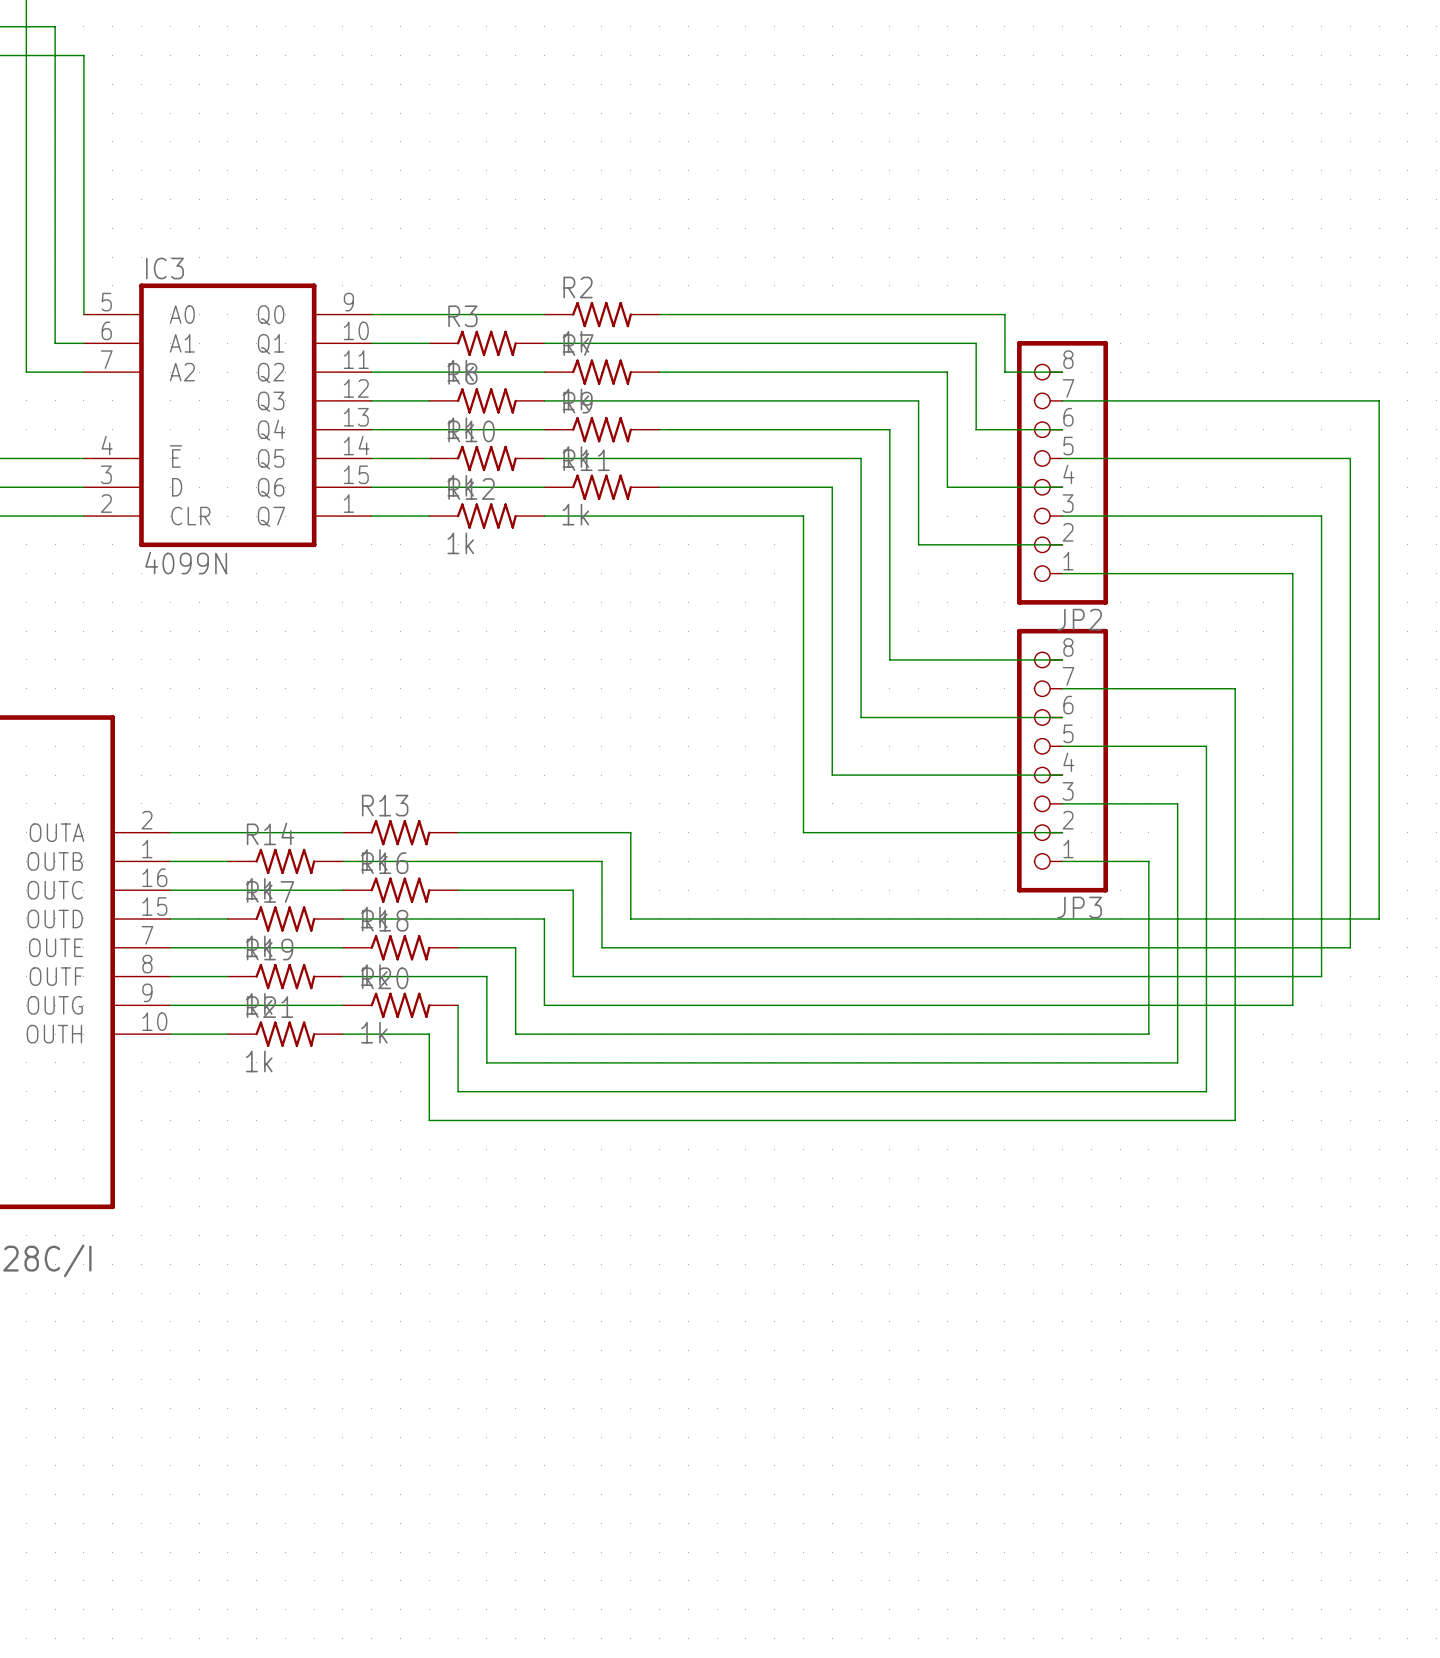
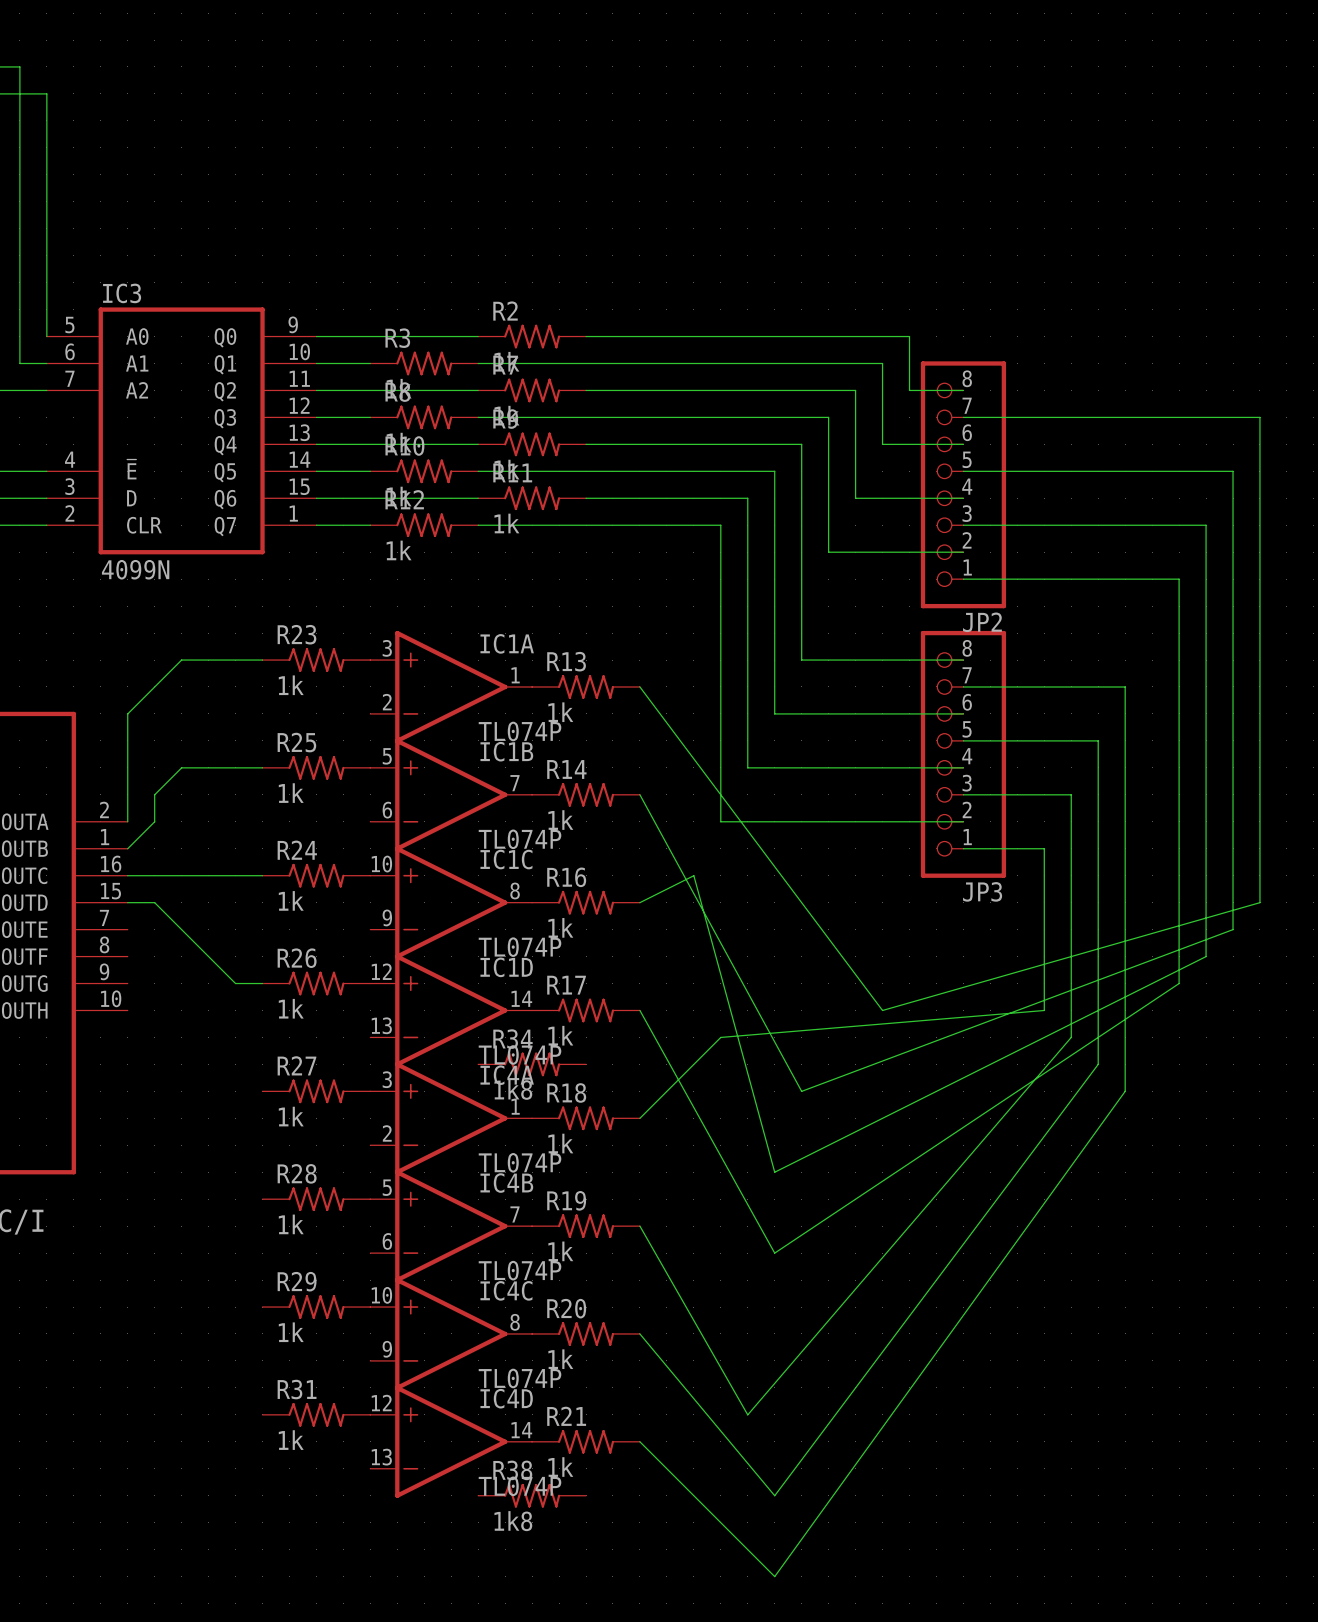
R23: none -> 1k (316, 660)
IC1A: none -> TL074P (451, 686)
R25: none -> 1k (316, 767)
IC1B: none -> TL074P (451, 794)
wire: (170, 832) (342, 832) -> (127, 821) (127, 713) (181, 660) (262, 660)
R13 position: (400, 832) -> (586, 686)
wire: (458, 832) (630, 832) (630, 918) (1379, 918) -> (639, 686) (882, 1010) (1259, 902)
wire: (170, 861) (227, 861) -> (127, 848) (154, 821) (154, 794) (181, 767) (262, 767)
R14 position: (285, 861) -> (586, 794)
wire: (342, 861) (601, 861) (601, 947) (1350, 947) -> (639, 794) (801, 1091) (1233, 929)
R24: none -> 1k (316, 875)
R16 position: (400, 890) -> (586, 902)
wire: (458, 890) (573, 890) (573, 976) (1321, 976) -> (639, 902) (693, 875) (774, 1172) (1206, 956)
wire: (199, 918) (227, 918) -> none
R17 position: (285, 918) -> (586, 1010)
wire: (342, 918) (544, 918) (544, 1005) (1292, 1005) -> (639, 1010) (774, 1253) (1179, 983)
IC1C: none -> TL074P (451, 902)
wire: (170, 947) (342, 947) -> none
R18 position: (400, 947) -> (586, 1118)
wire: (458, 947) (515, 947) (515, 1034) (1148, 1034) -> (639, 1118) (720, 1037) (1044, 1010)
wire: (170, 976) (227, 976) -> none
R19 position: (285, 976) -> (586, 1226)
wire: (342, 976) (486, 976) (486, 1062) (1177, 1062) -> (639, 1226) (747, 1414) (1071, 1037)
wire: (170, 1005) (285, 1005) -> (154, 902) (235, 983)
R26: none -> 1k (316, 983)
R20 position: (400, 1005) -> (586, 1333)
wire: (458, 1005) (458, 1091) (1206, 1091) -> (639, 1333) (774, 1495) (1098, 1064)
wire: (170, 1034) (227, 1034) -> none
R21 position: (285, 1034) -> (586, 1441)
wire: (342, 1034) (429, 1034) (429, 1120) (1235, 1120) -> (639, 1441) (774, 1576) (1125, 1091)
IC1D: none -> TL074P (451, 1010)
R34: none -> 1k8 (532, 1064)
R27: none -> 1k (316, 1091)
IC4A: none -> TL074P (451, 1118)
R28: none -> 1k (316, 1199)
IC4B: none -> TL074P (451, 1226)
R29: none -> 1k (316, 1307)
IC4C: none -> TL074P (451, 1333)
R31: none -> 1k (316, 1414)
IC4D: none -> TL074P (451, 1441)
R38: none -> 1k8 (532, 1495)

